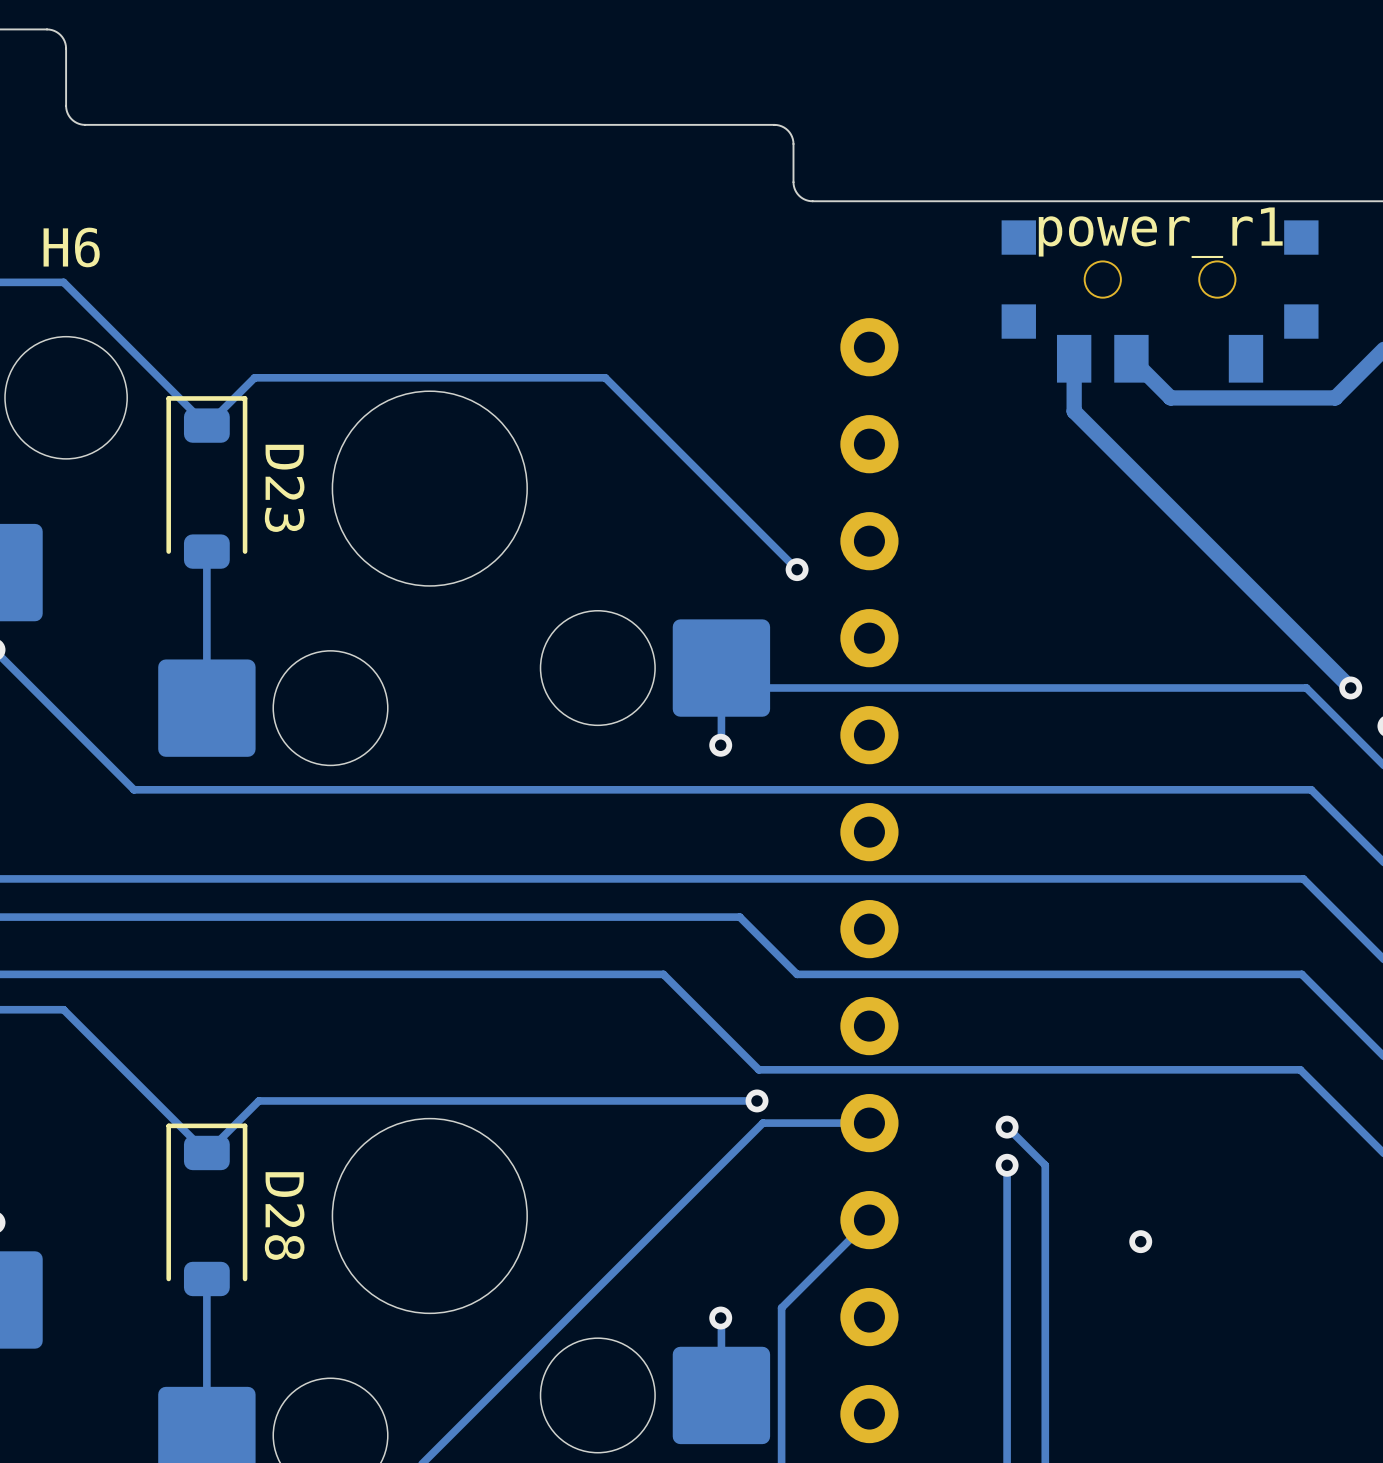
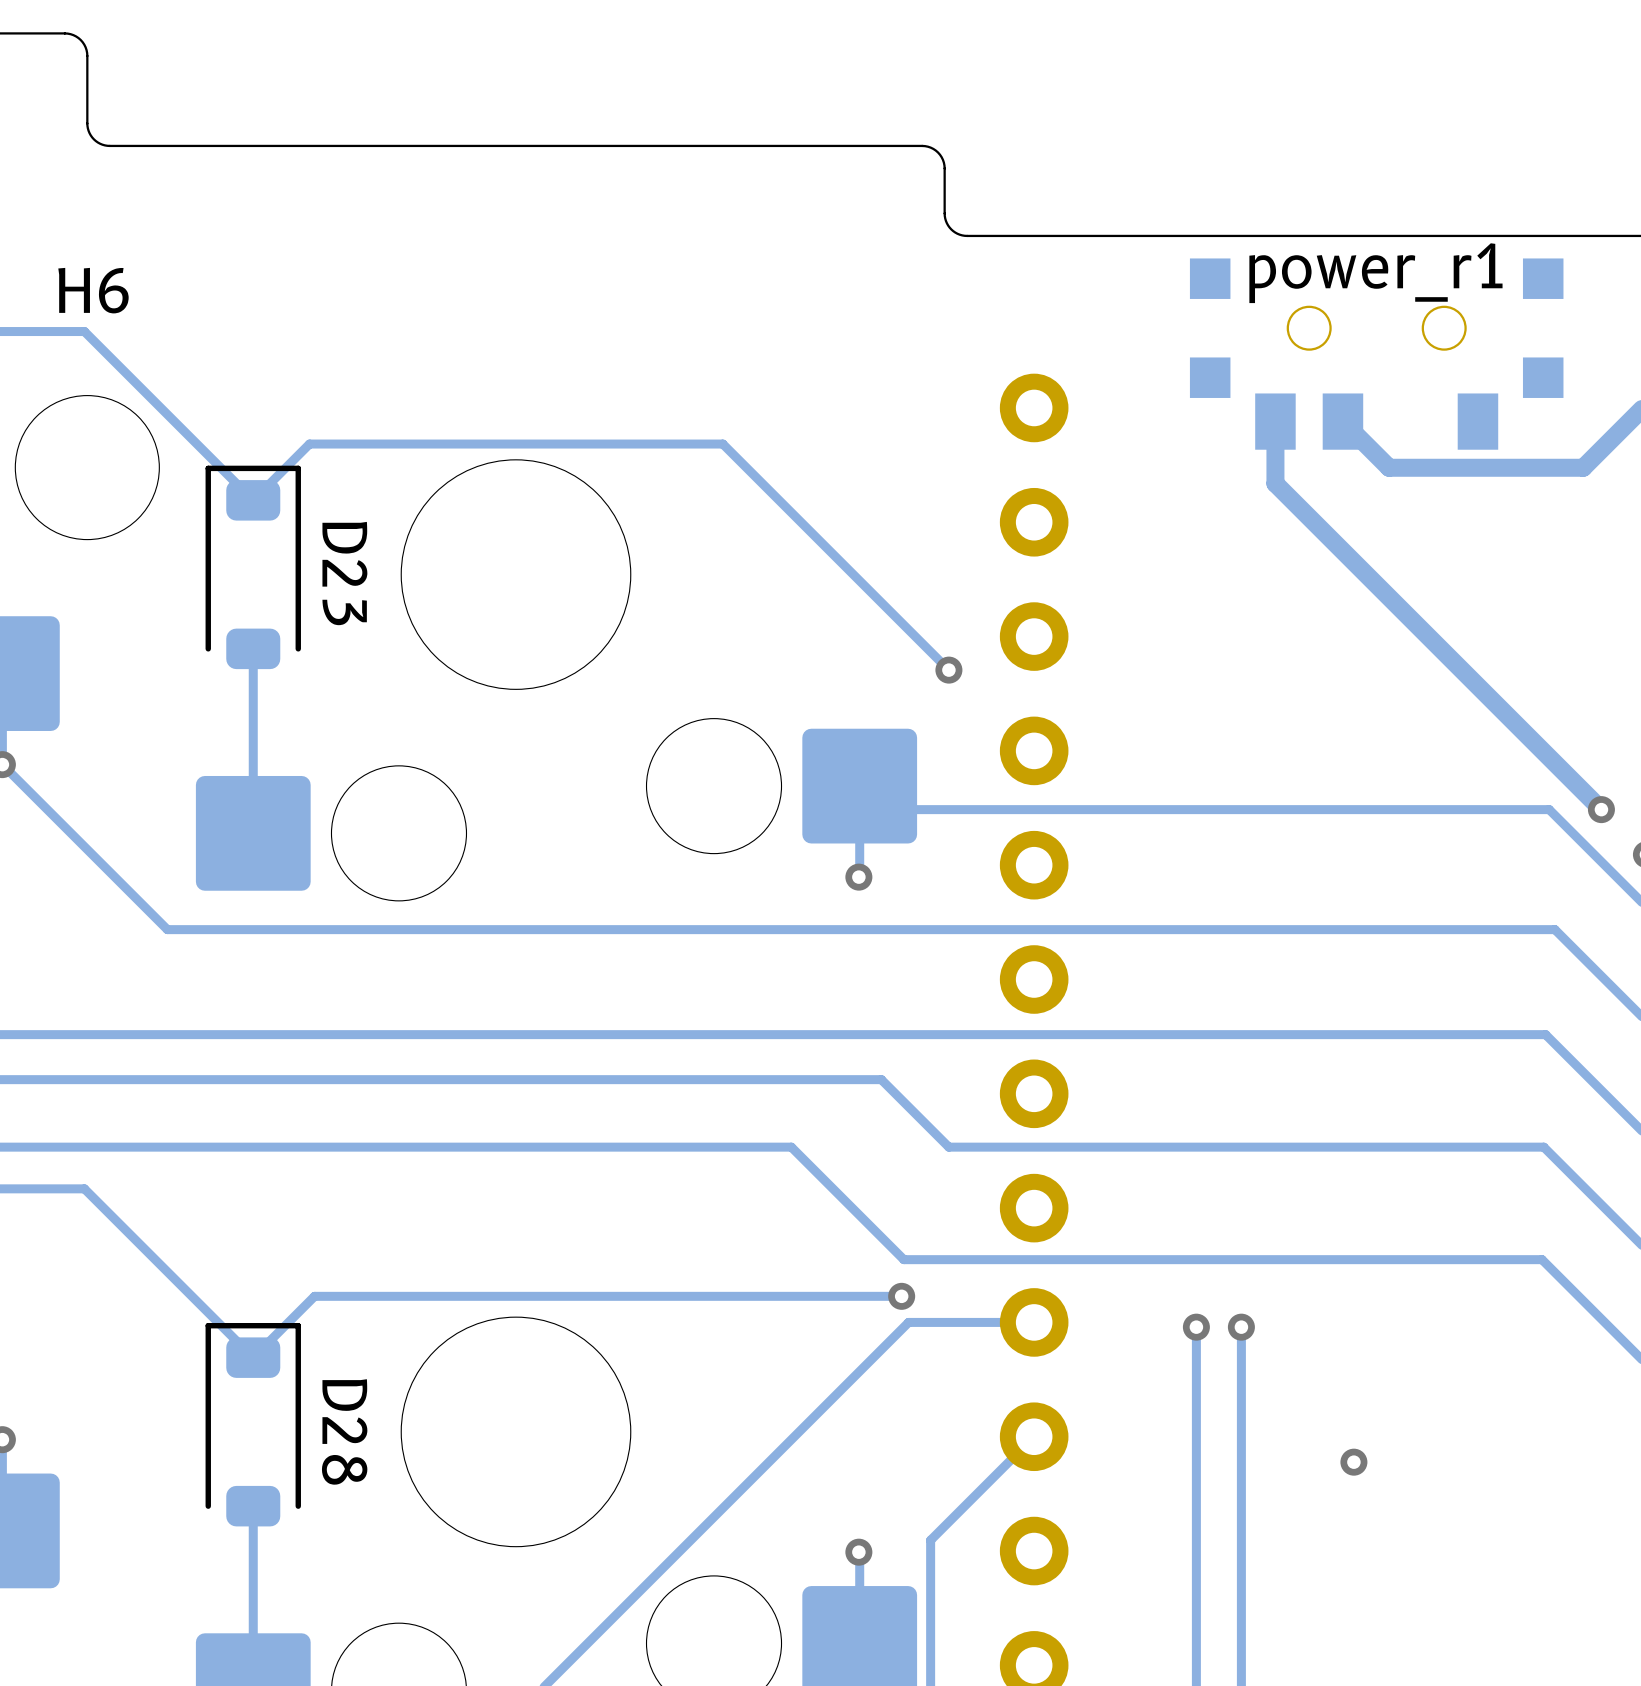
track: (1007, 1127) (1045, 1165) -> (1241, 1327) (1241, 1372)
track: none -> (1196, 1327) (1196, 1372)
via position: (1007, 1165) -> (1241, 1327)

